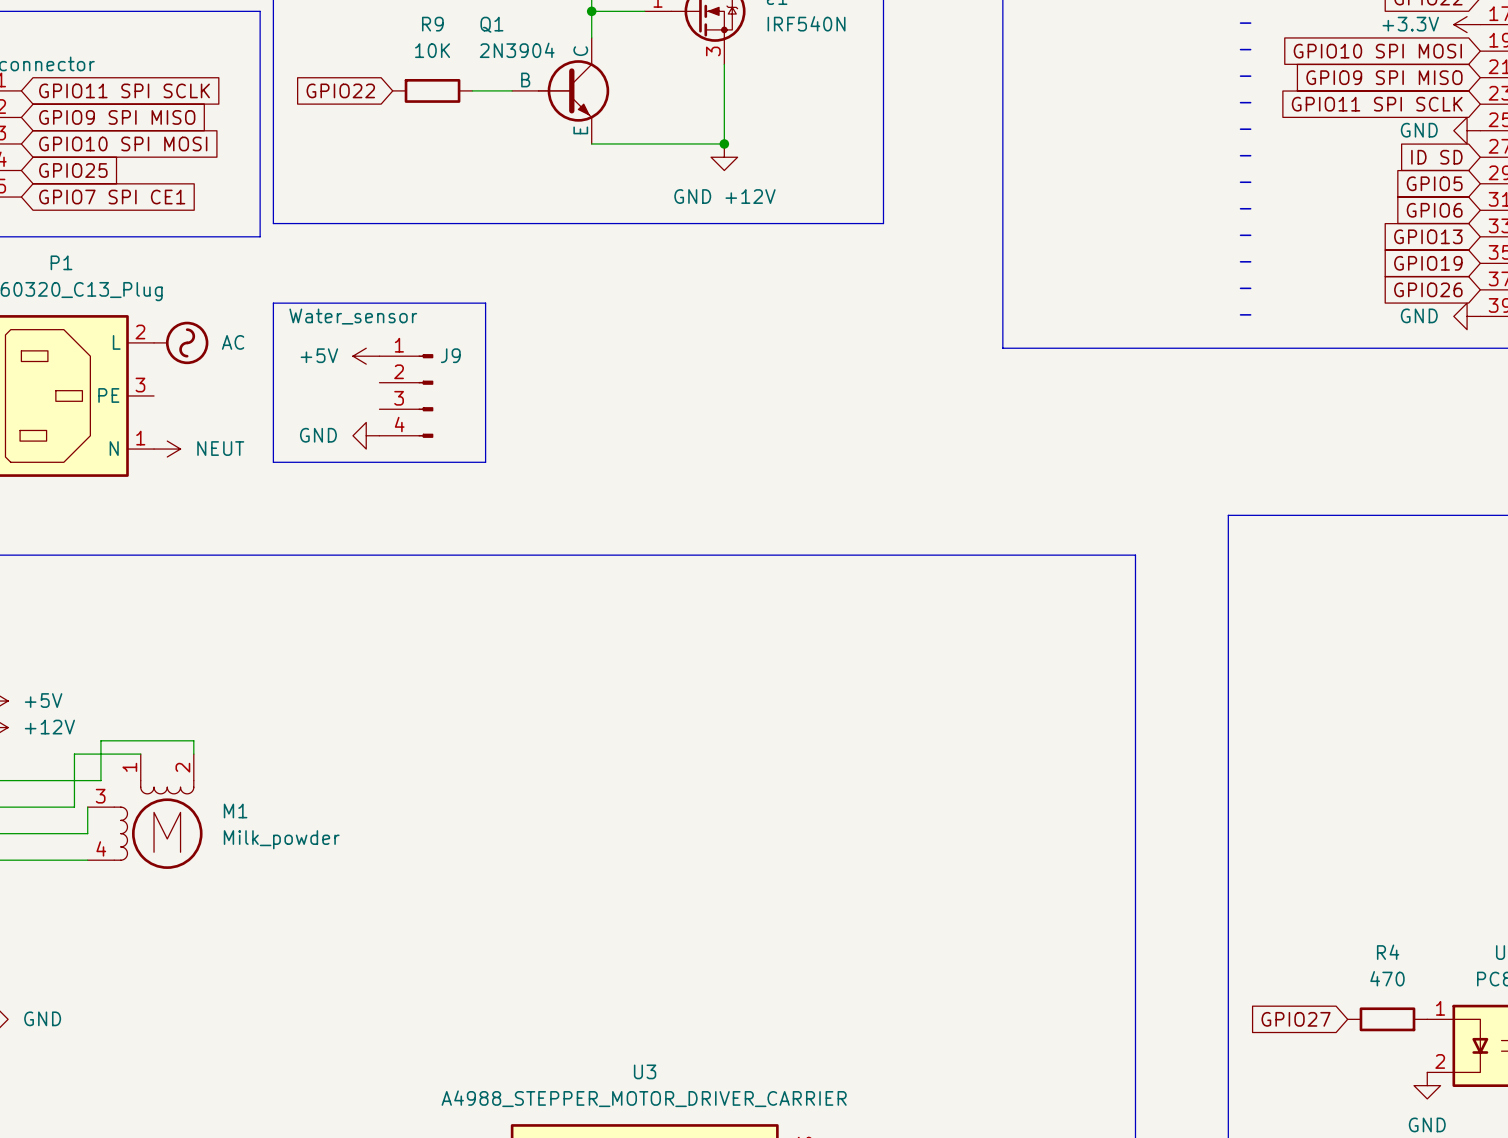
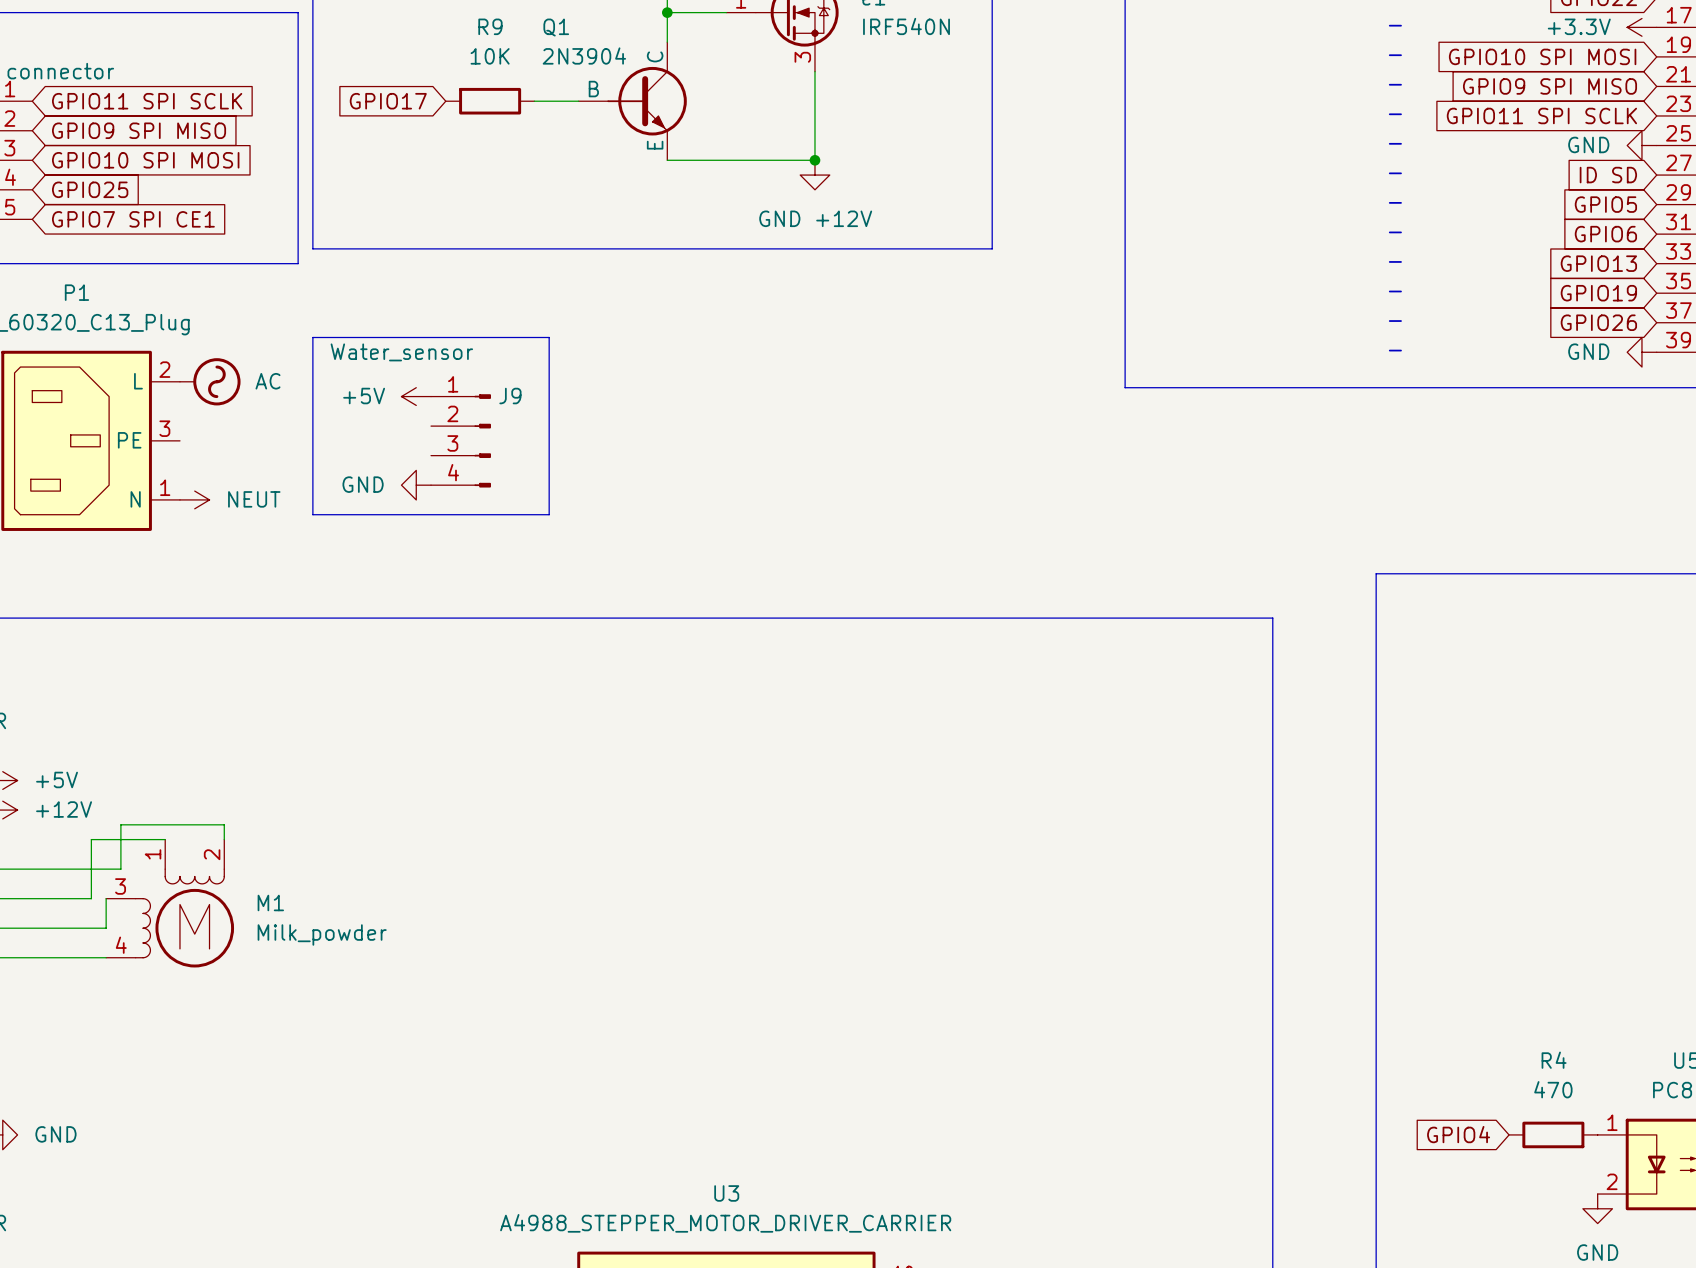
global label: GPIO22 (340, 90) -> GPIO17 (388, 101)
global label: GPIO27 (1296, 1019) -> GPIO4 (1458, 1134)

